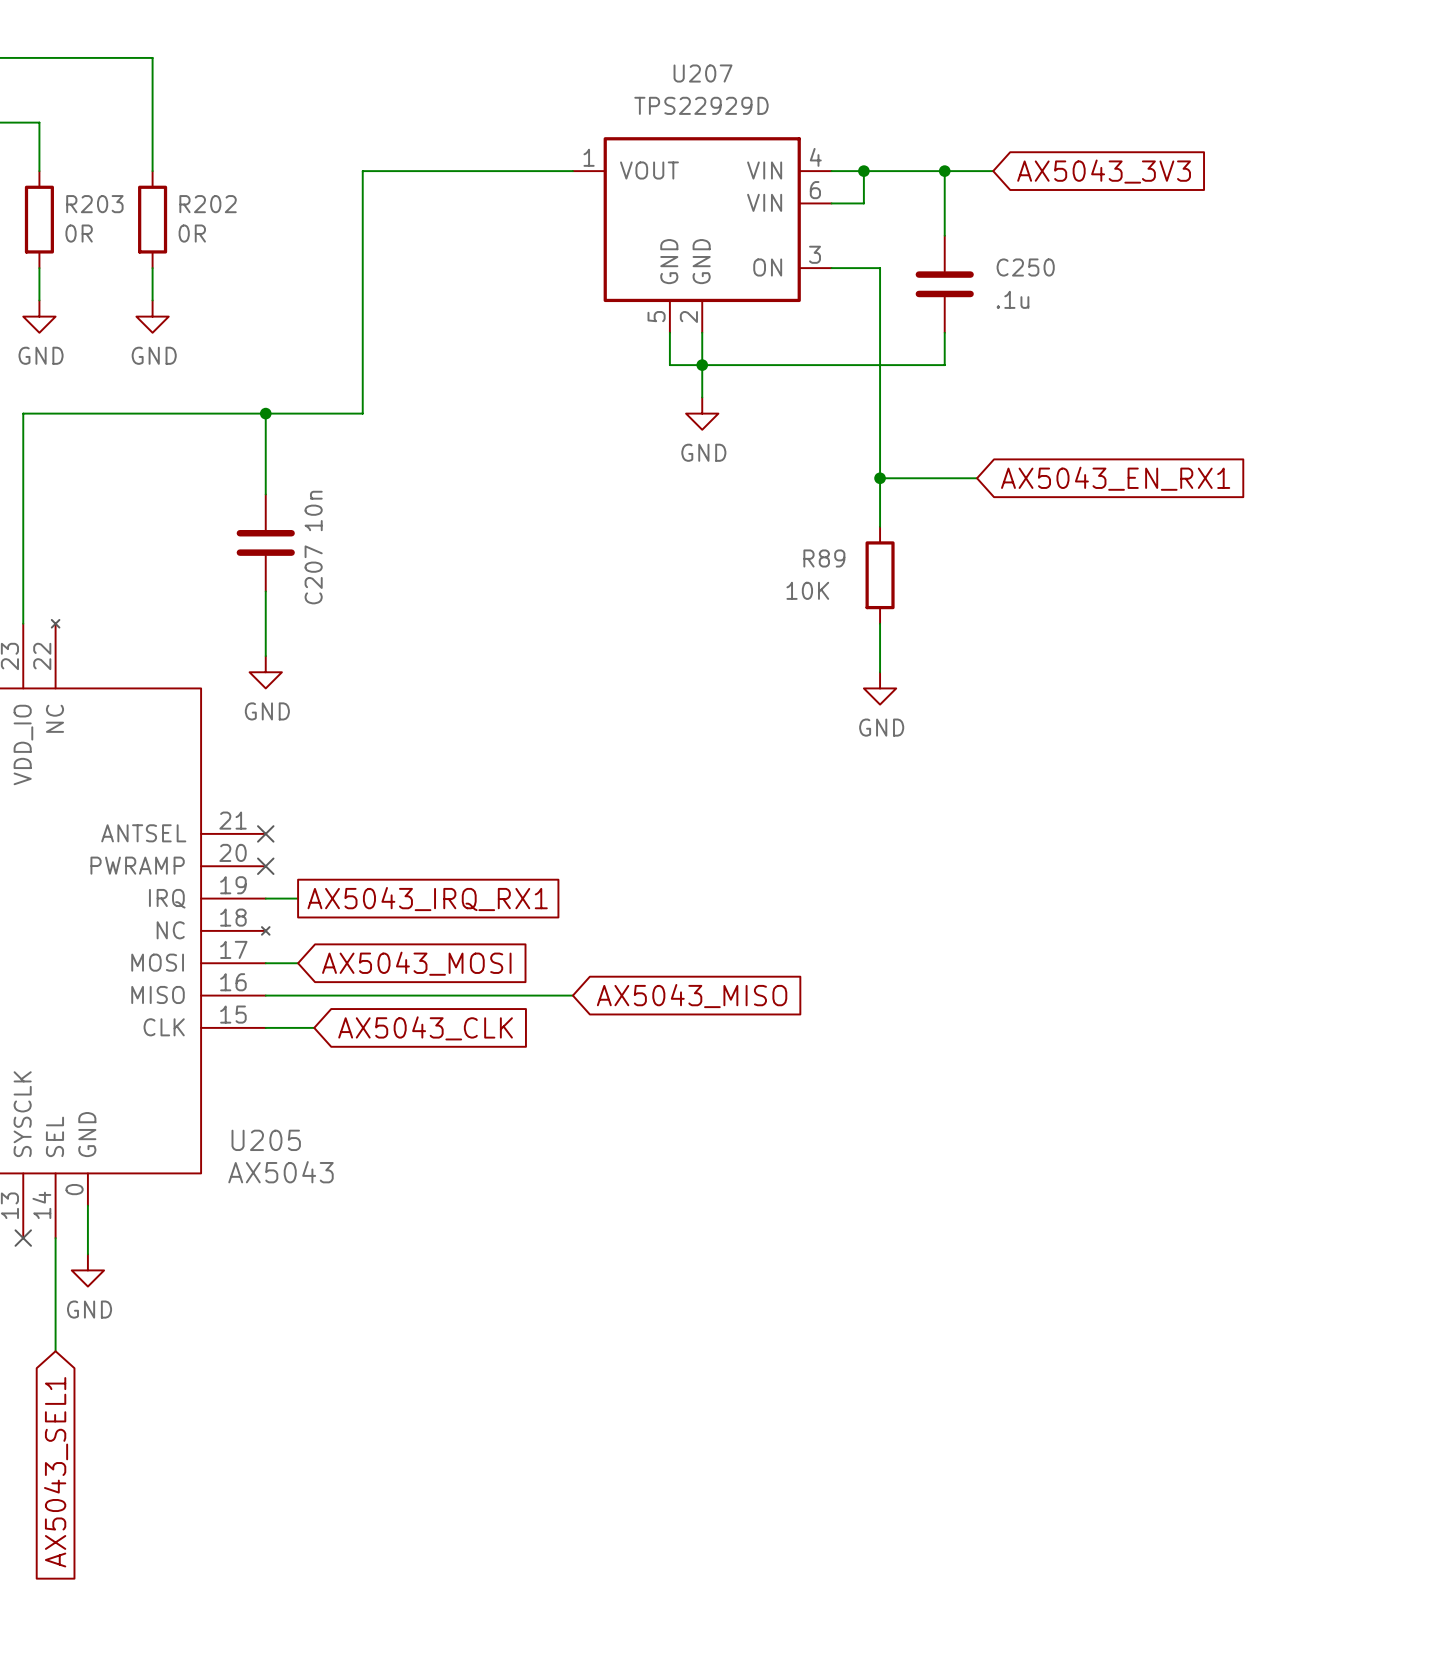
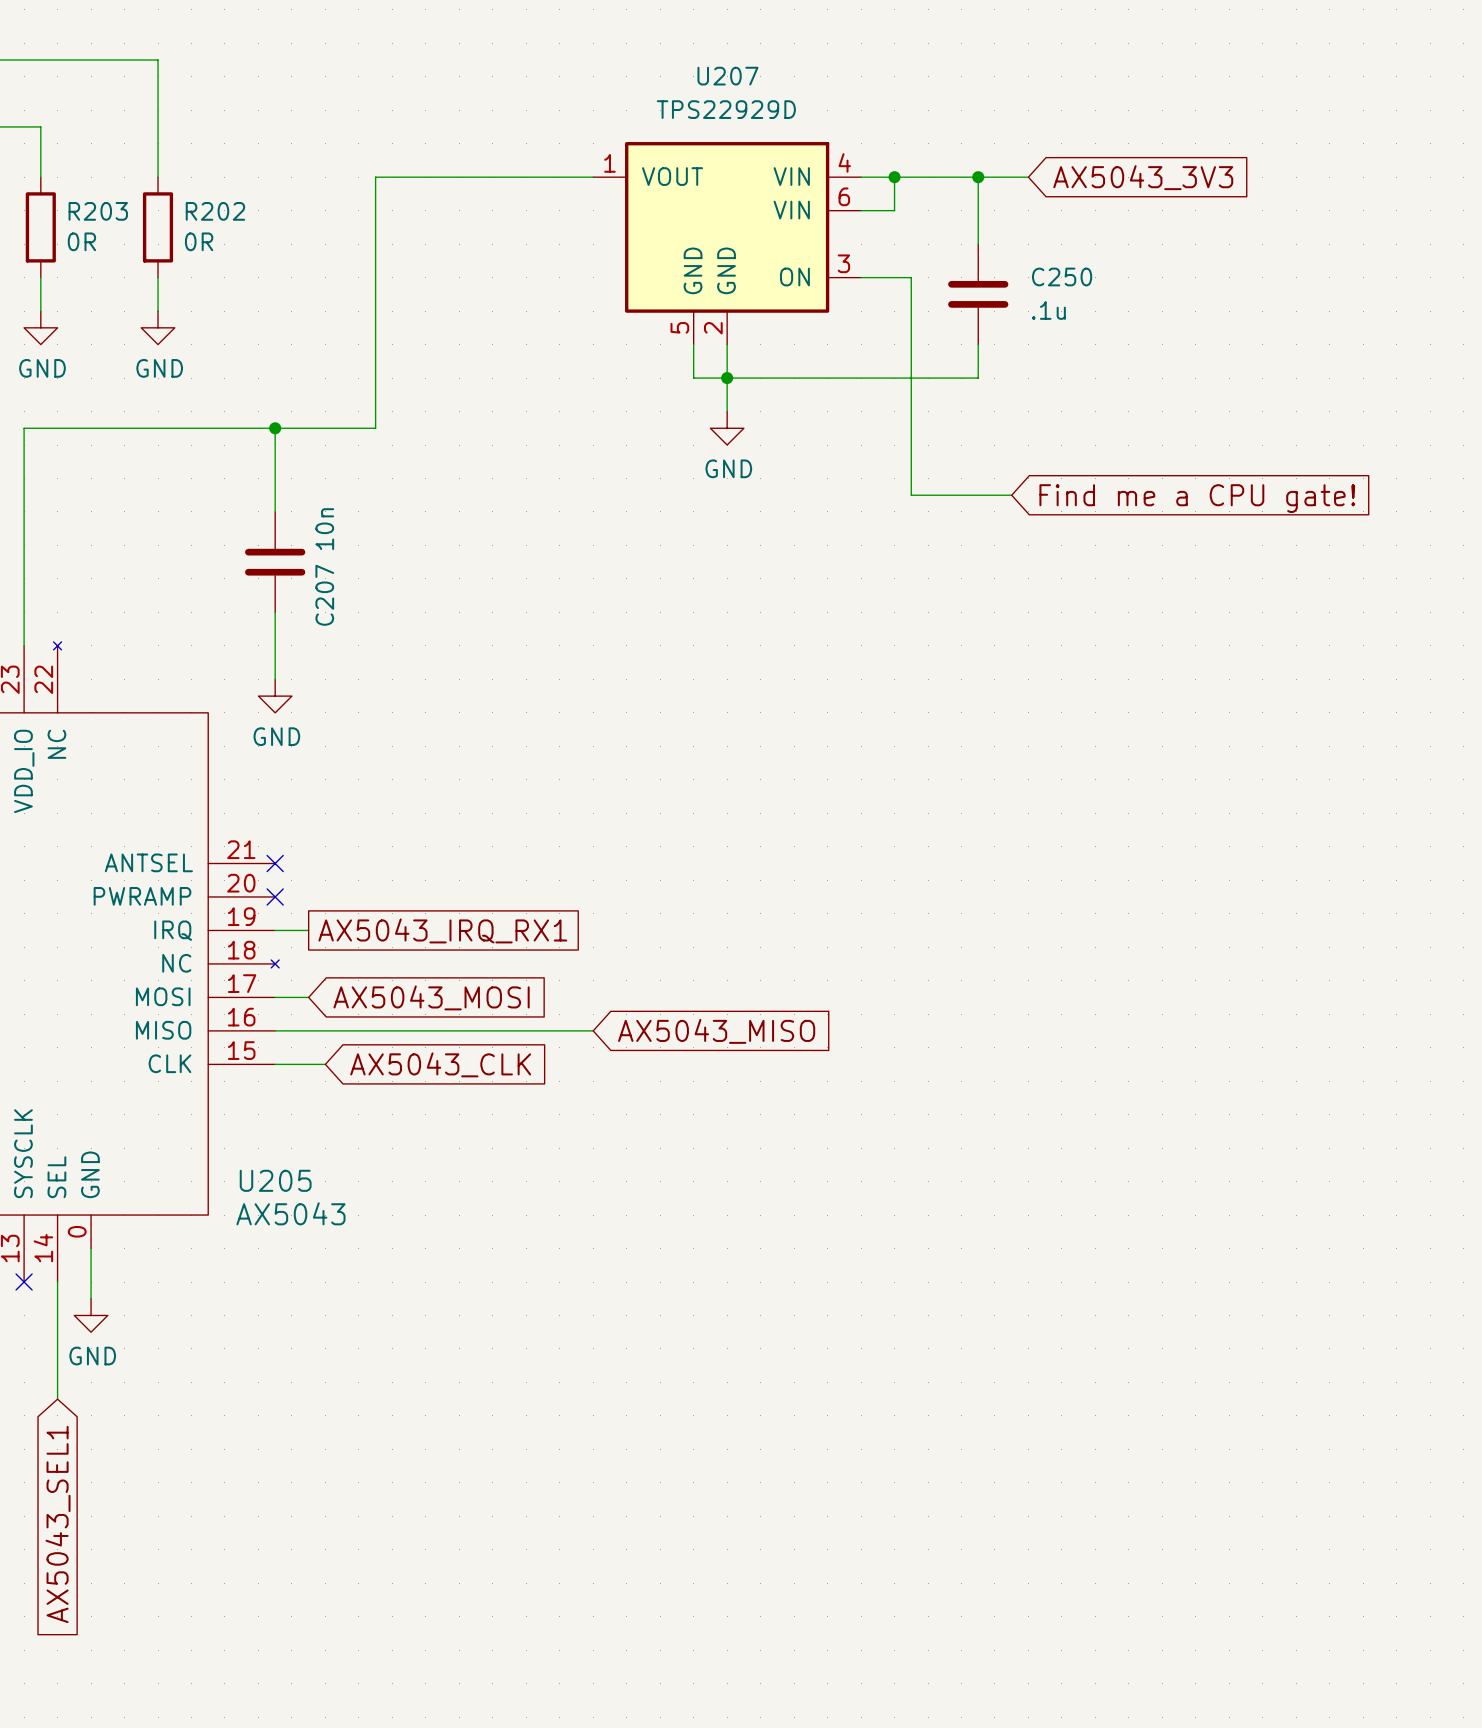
wire: (880, 478) (880, 526) -> none
junction: (880, 478) -> none
global label: AX5043_EN_RX1 (1115, 478) -> Find me a CPU gate! (1197, 498)
R89: 10K (880, 575) -> none
wire: (880, 623) (880, 672) -> none
power symbol: GND (880, 688) -> none

